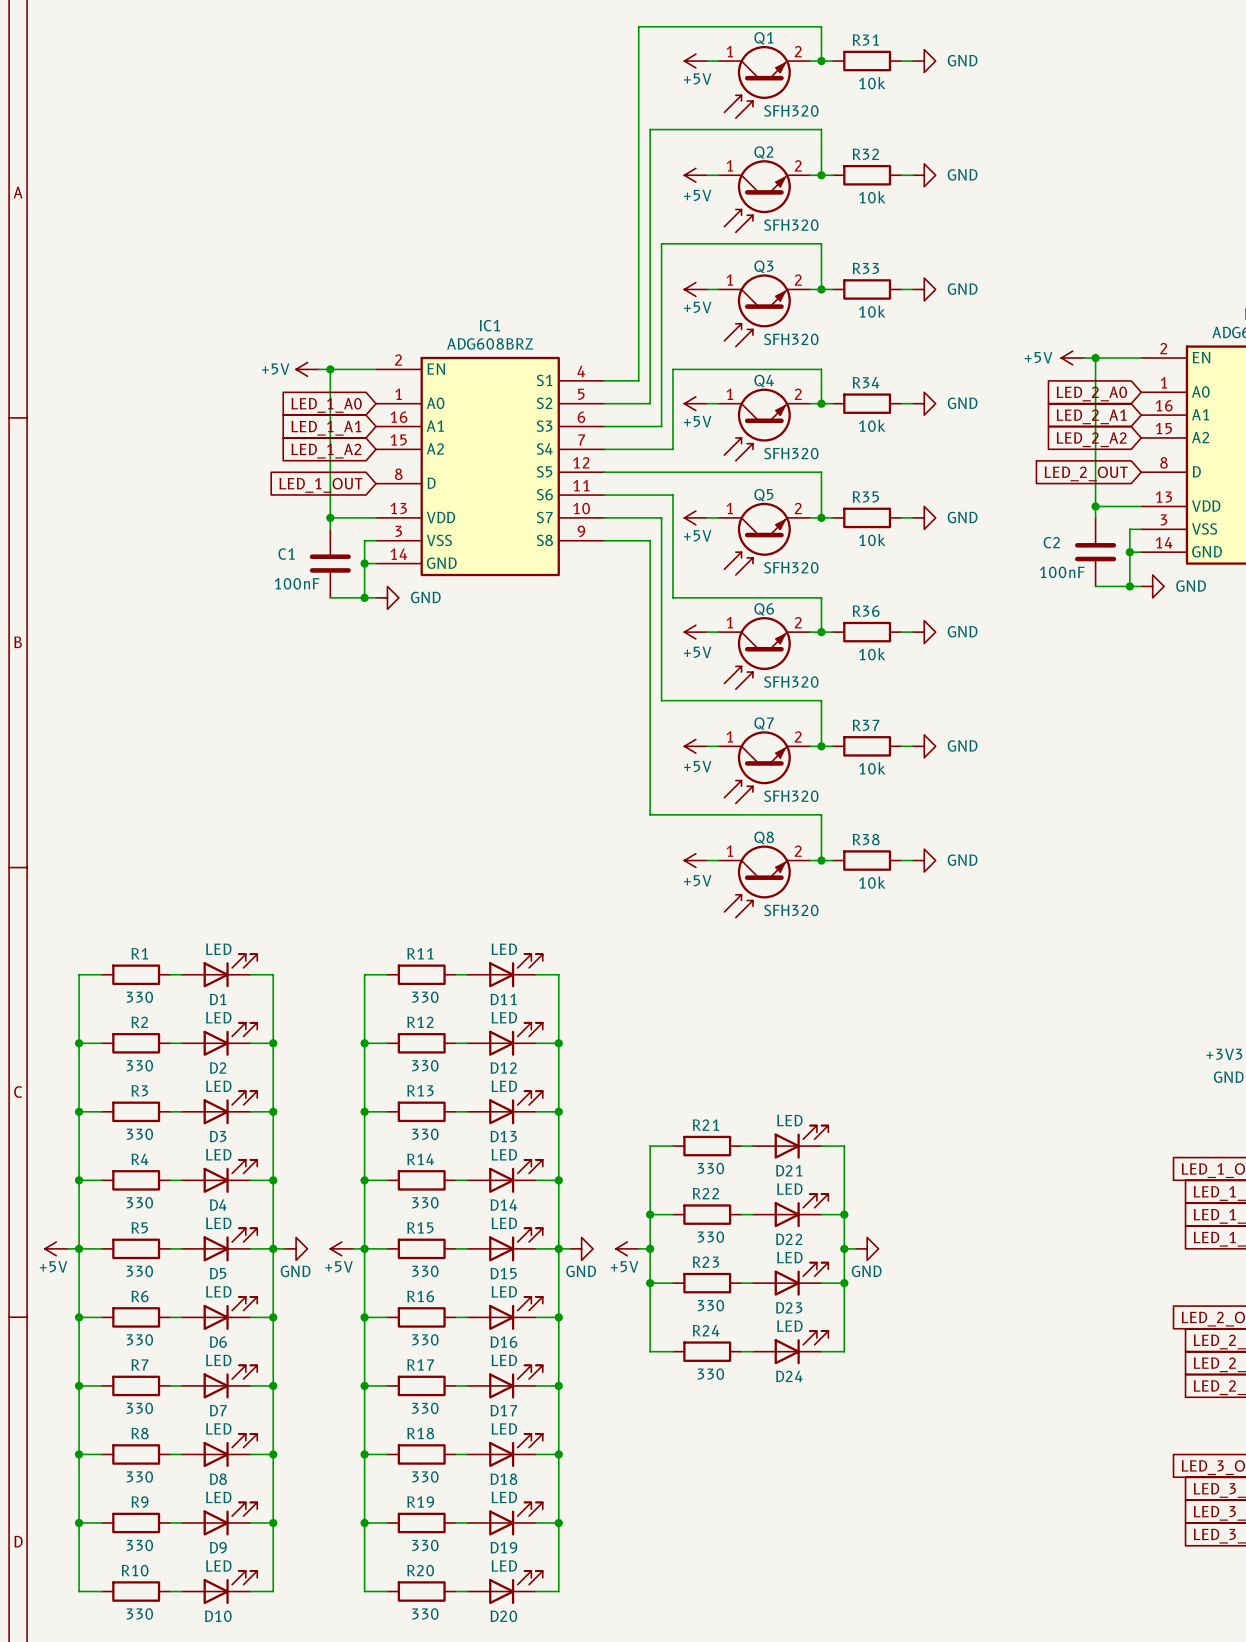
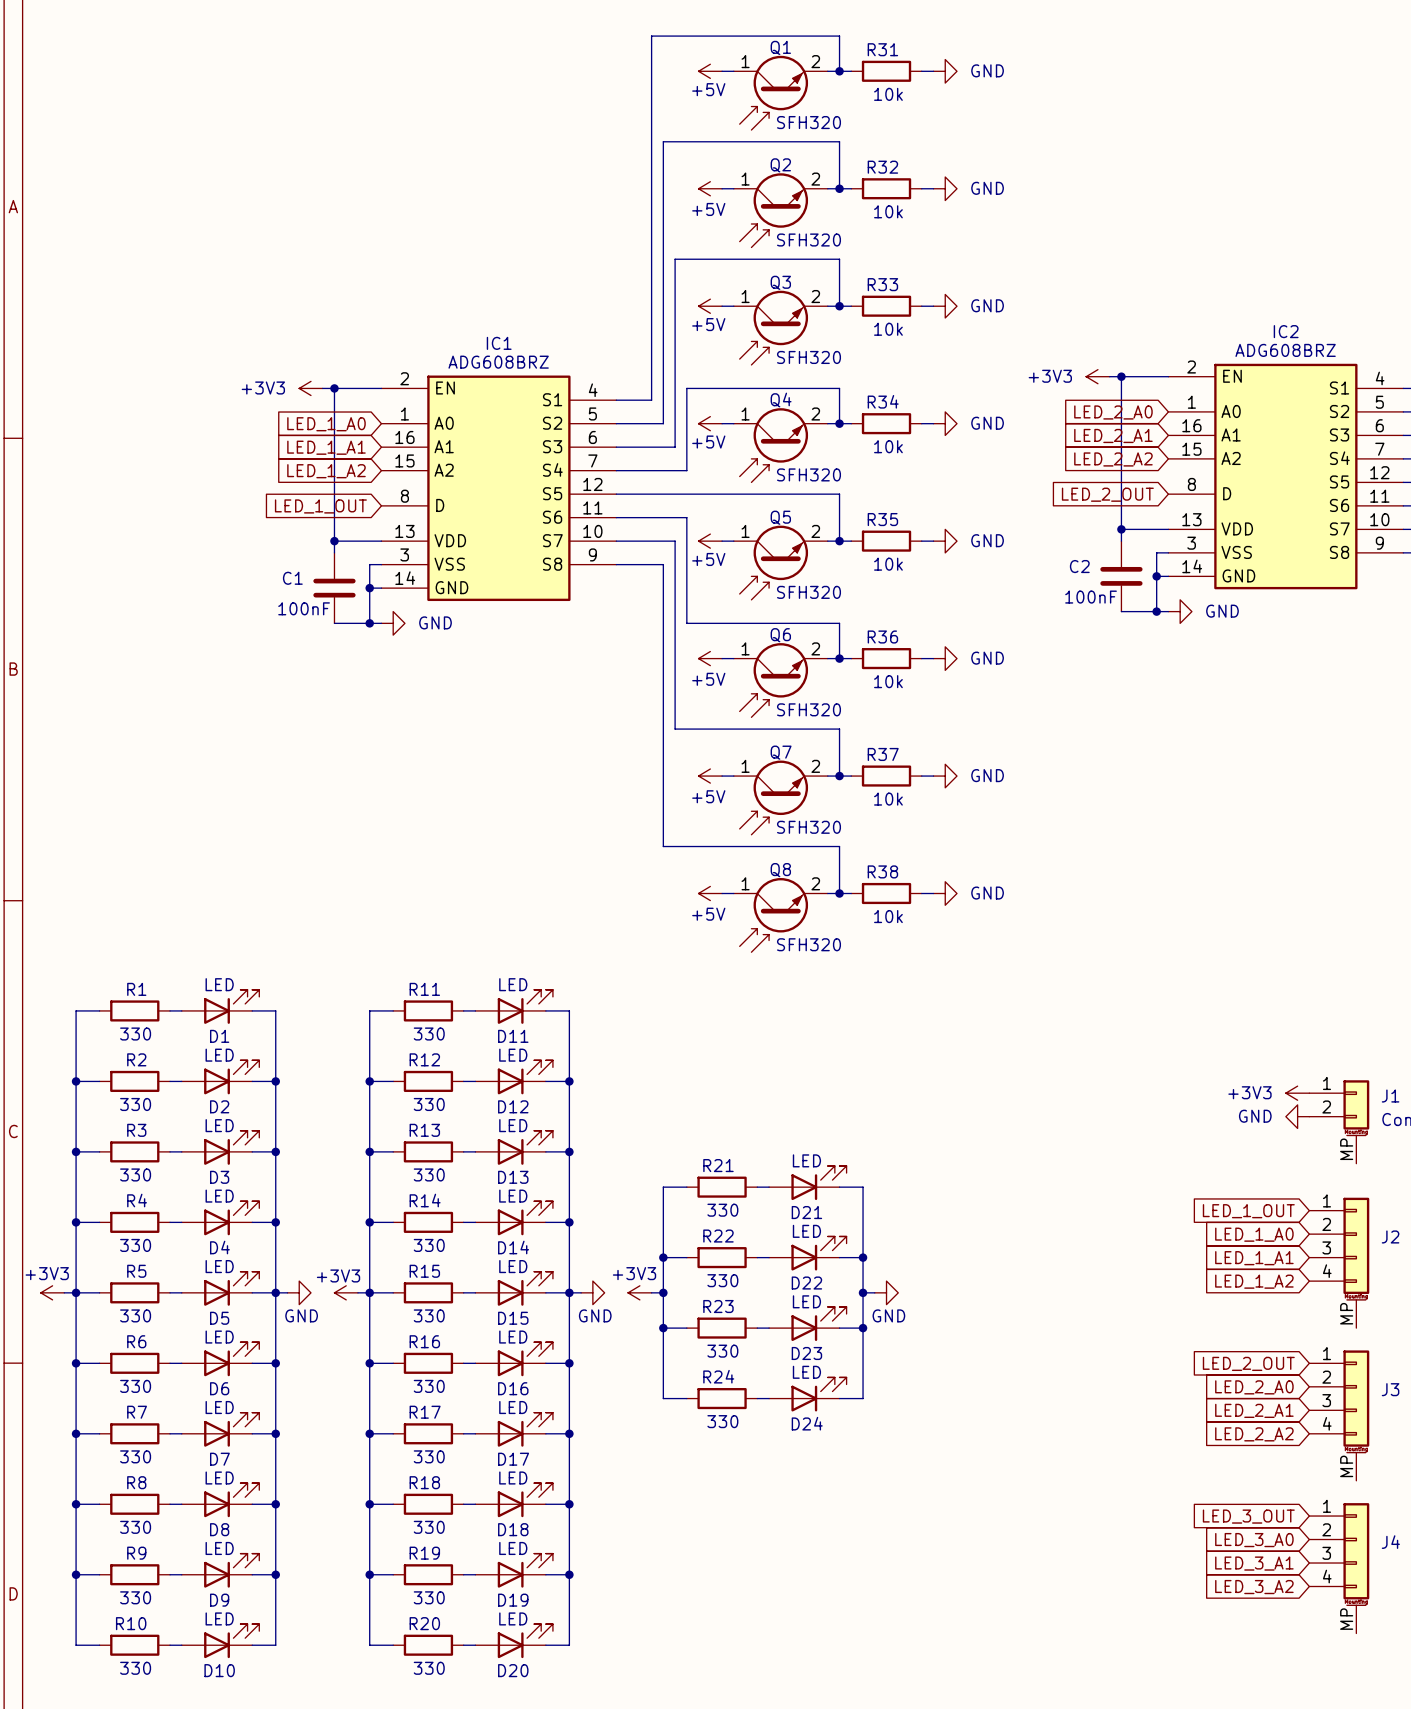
power symbol: +5V (1072, 358) -> +3V3 (1097, 376)
power symbol: +5V (307, 369) -> +3V3 (310, 388)
power symbol: +5V (56, 1248) -> +3V3 (52, 1292)
power symbol: +5V (341, 1248) -> +3V3 (346, 1292)
power symbol: +5V (627, 1248) -> +3V3 (639, 1292)

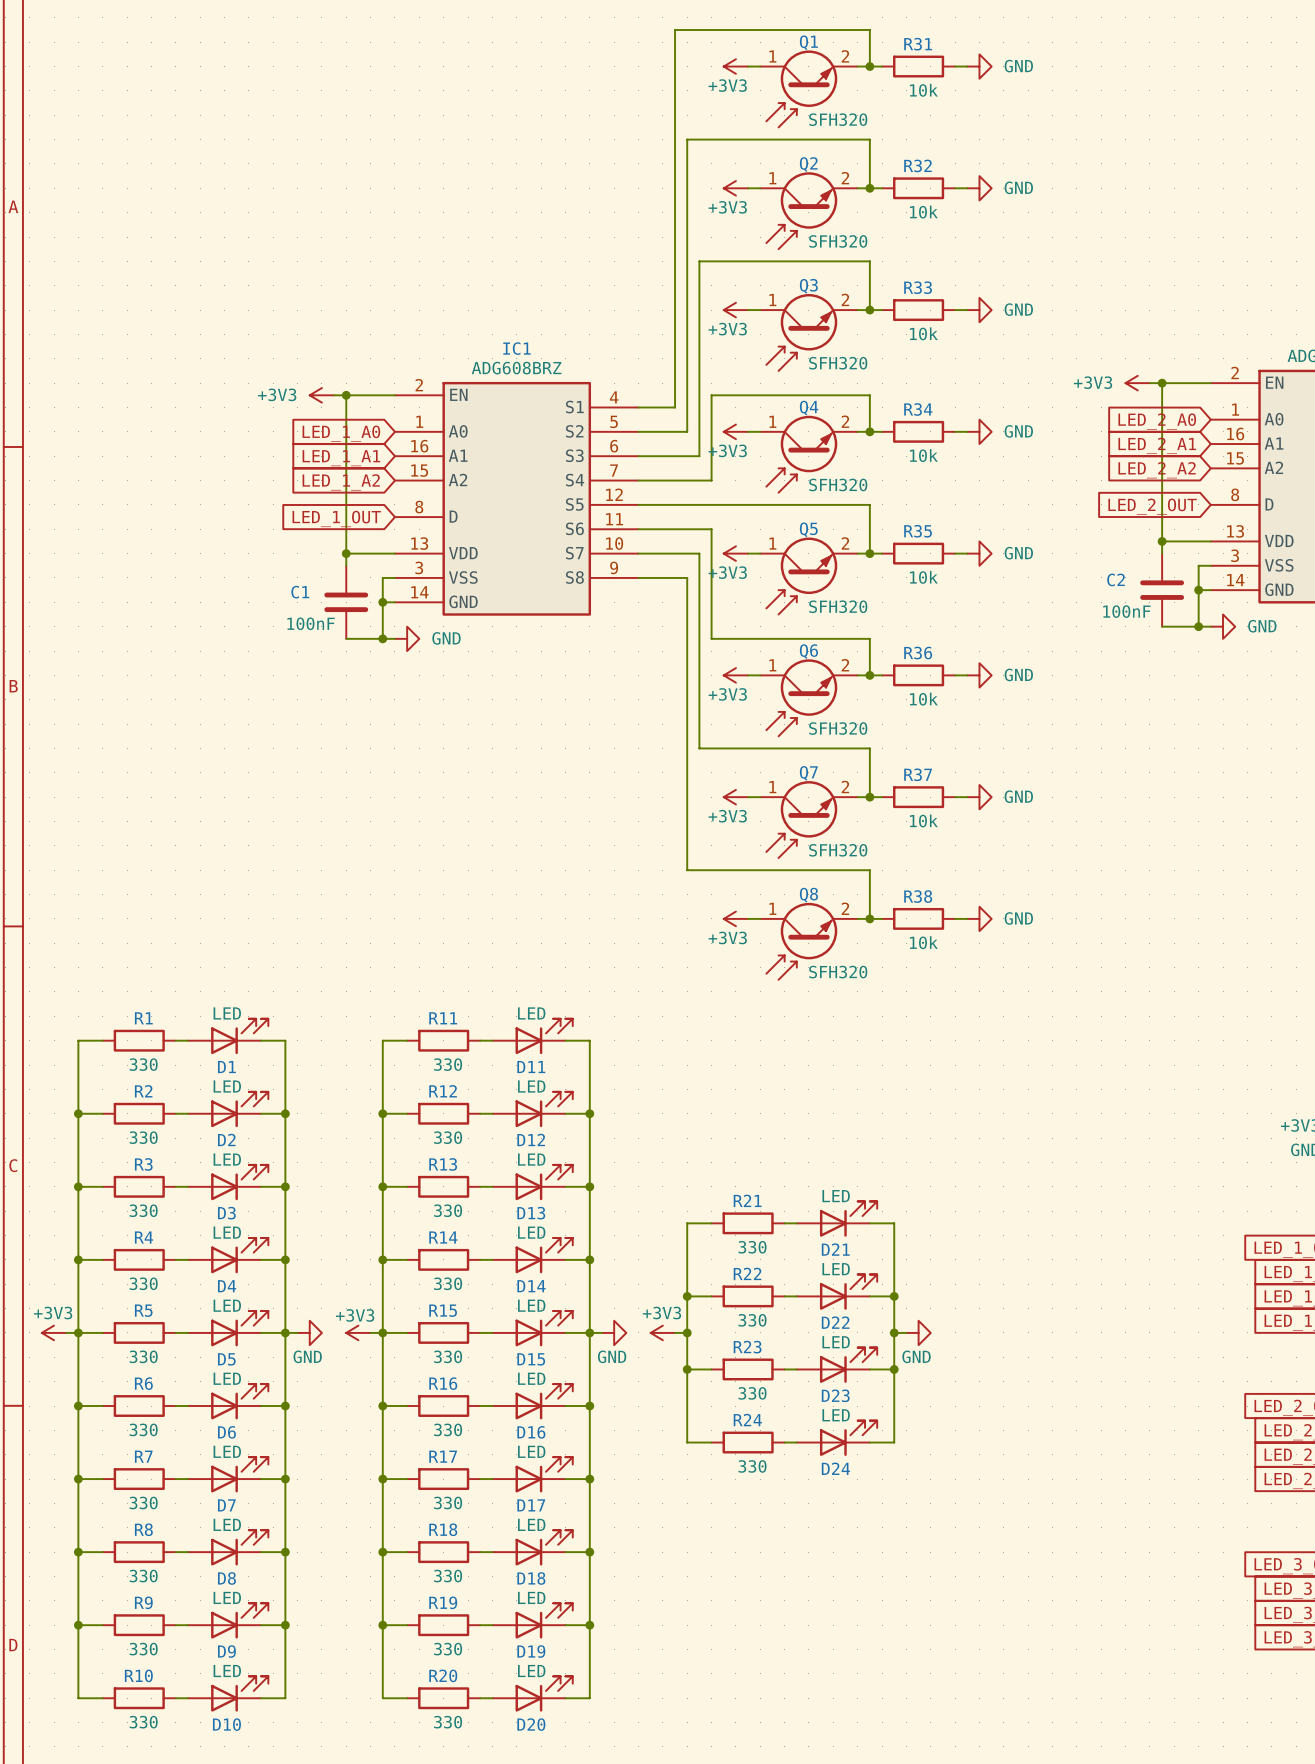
power symbol: +5V (710, 71) -> +3V3 (735, 66)
power symbol: +5V (710, 188) -> +3V3 (735, 188)
power symbol: +5V (710, 306) -> +3V3 (735, 310)
power symbol: +5V (710, 423) -> +3V3 (735, 431)
power symbol: +5V (710, 541) -> +3V3 (735, 553)
power symbol: +5V (710, 658) -> +3V3 (735, 675)
power symbol: +5V (710, 776) -> +3V3 (735, 797)
power symbol: +5V (710, 893) -> +3V3 (735, 918)

